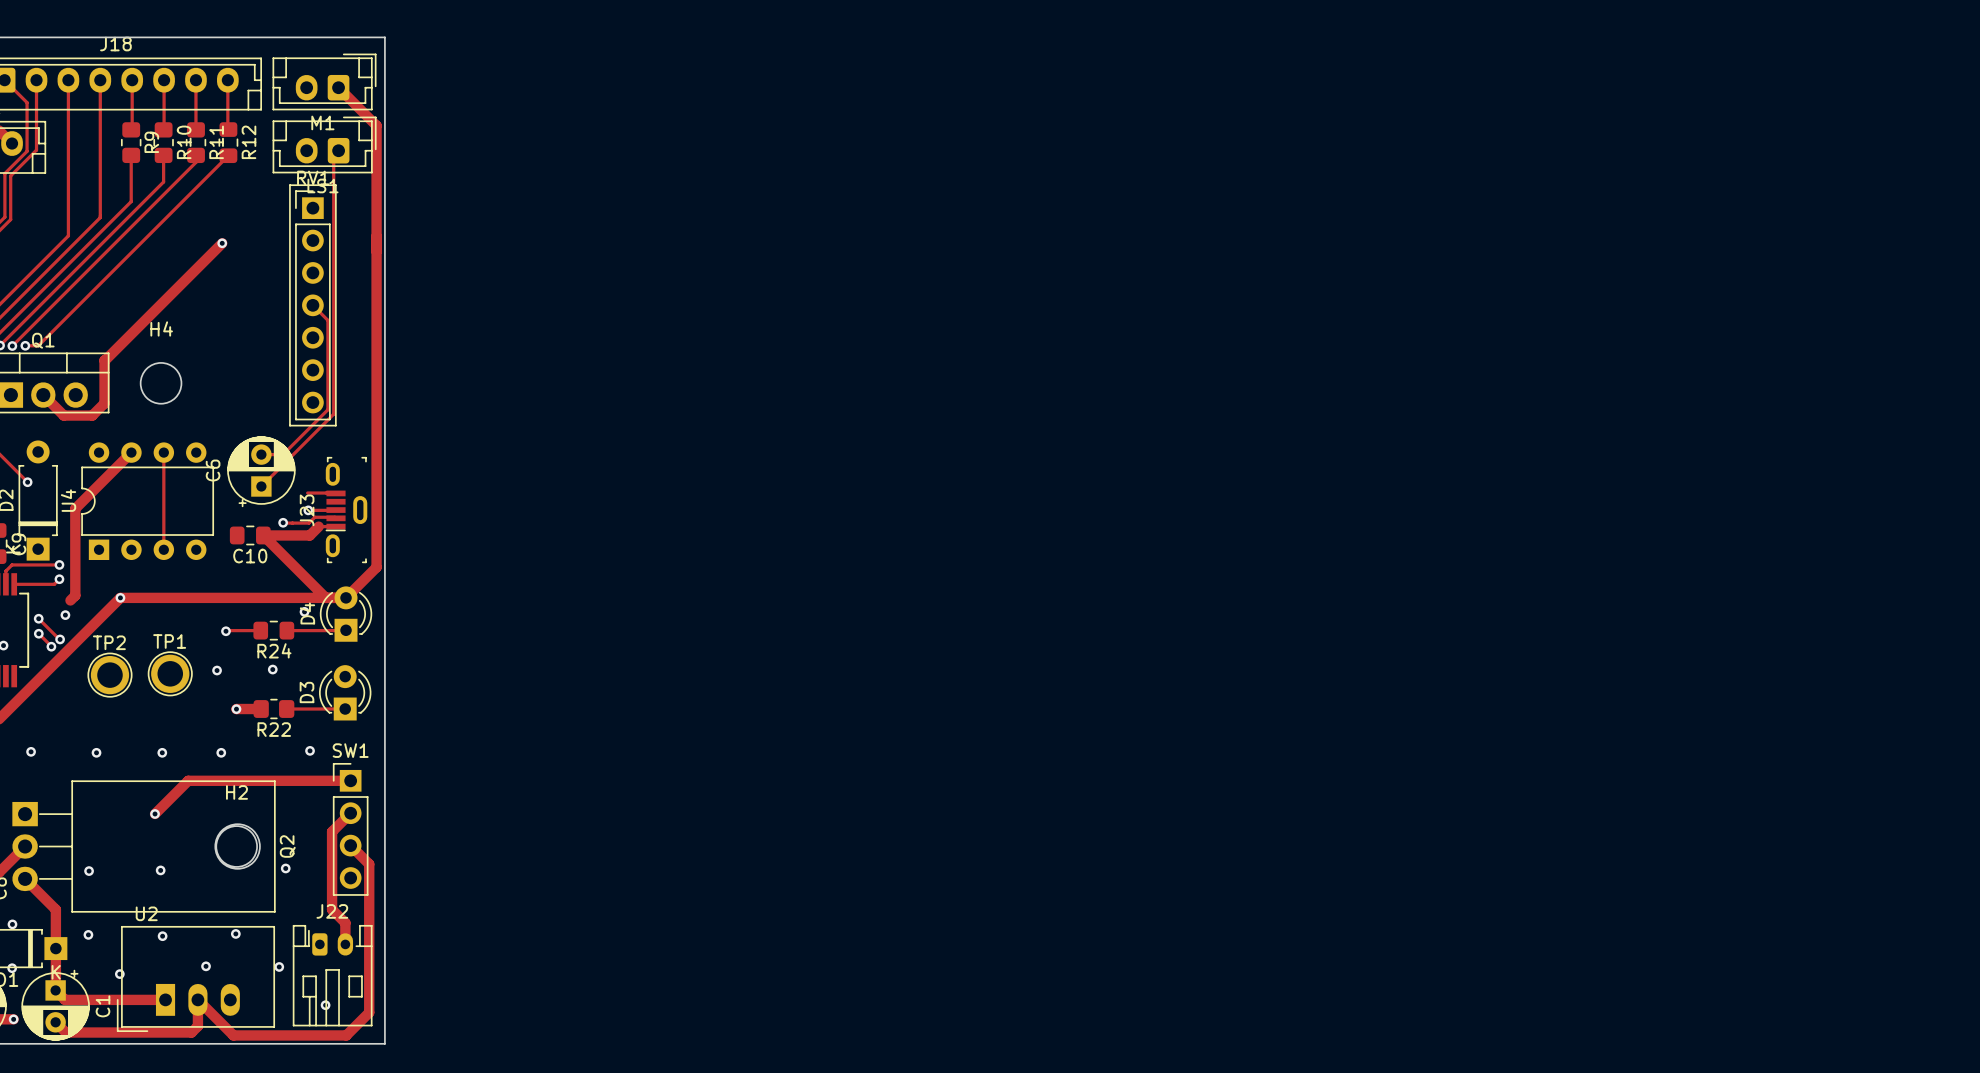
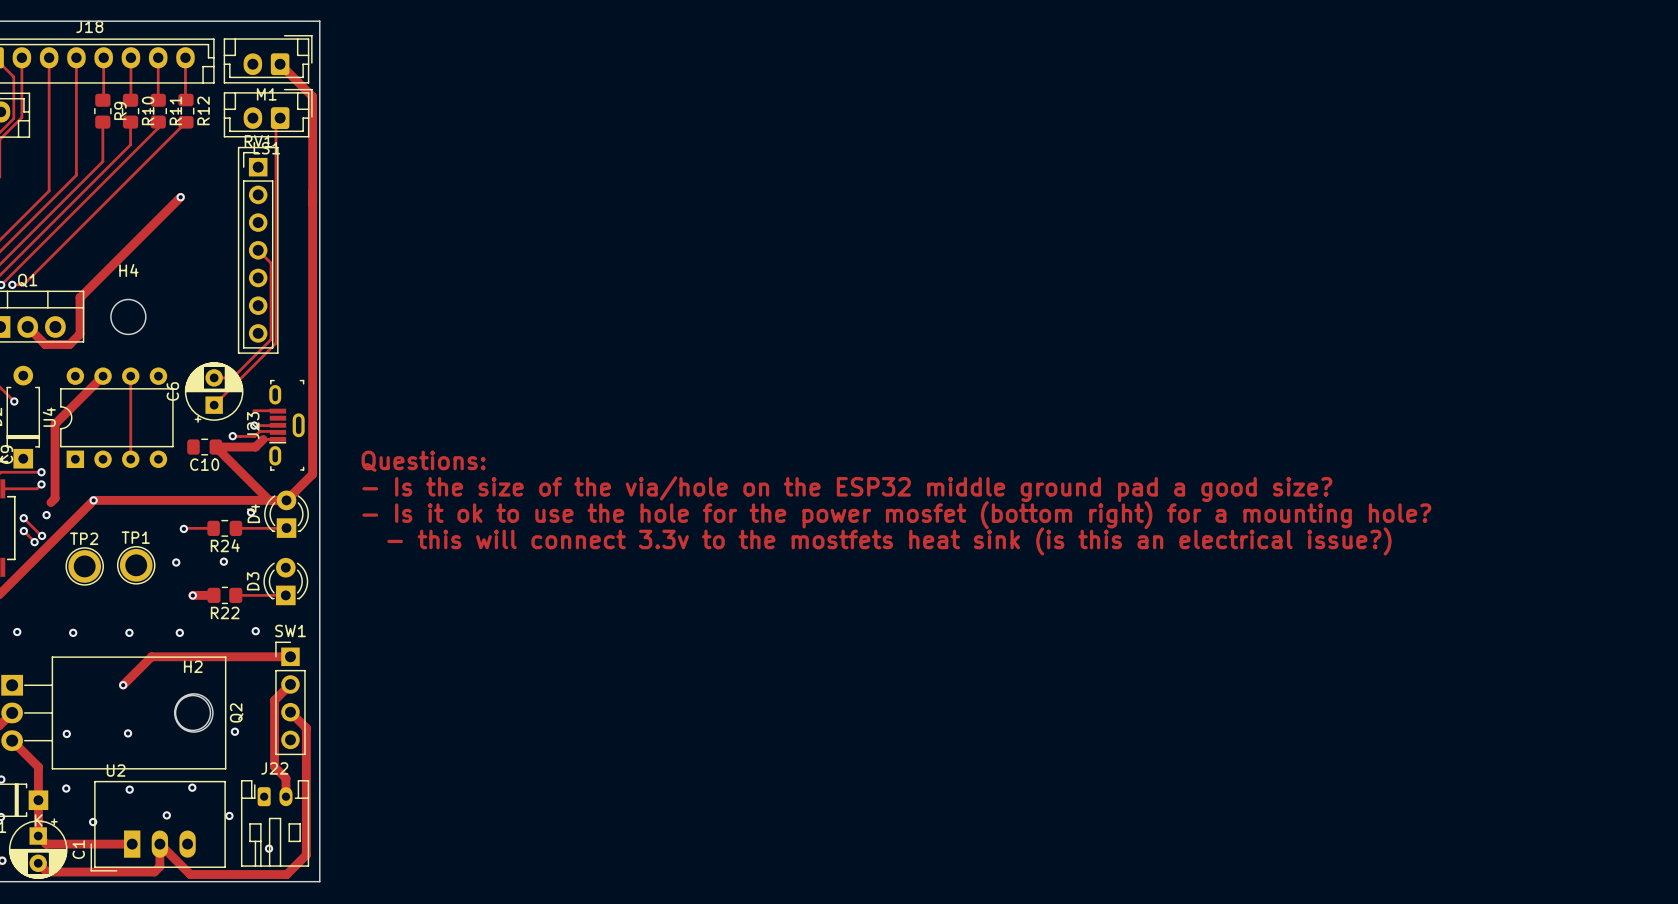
text: none -> Questions: (423, 461)
text: none -> - Is the size of the via/hole on the ESP32 middle ground pad a good size? (847, 489)
text: none -> - Is it ok to use the hole for the power mosfet (bottom right) for a mounting hole? (896, 515)
text: none -> - this will connect 3.3v to the mostfets heat sink (is this an electrical issue?) (889, 541)

